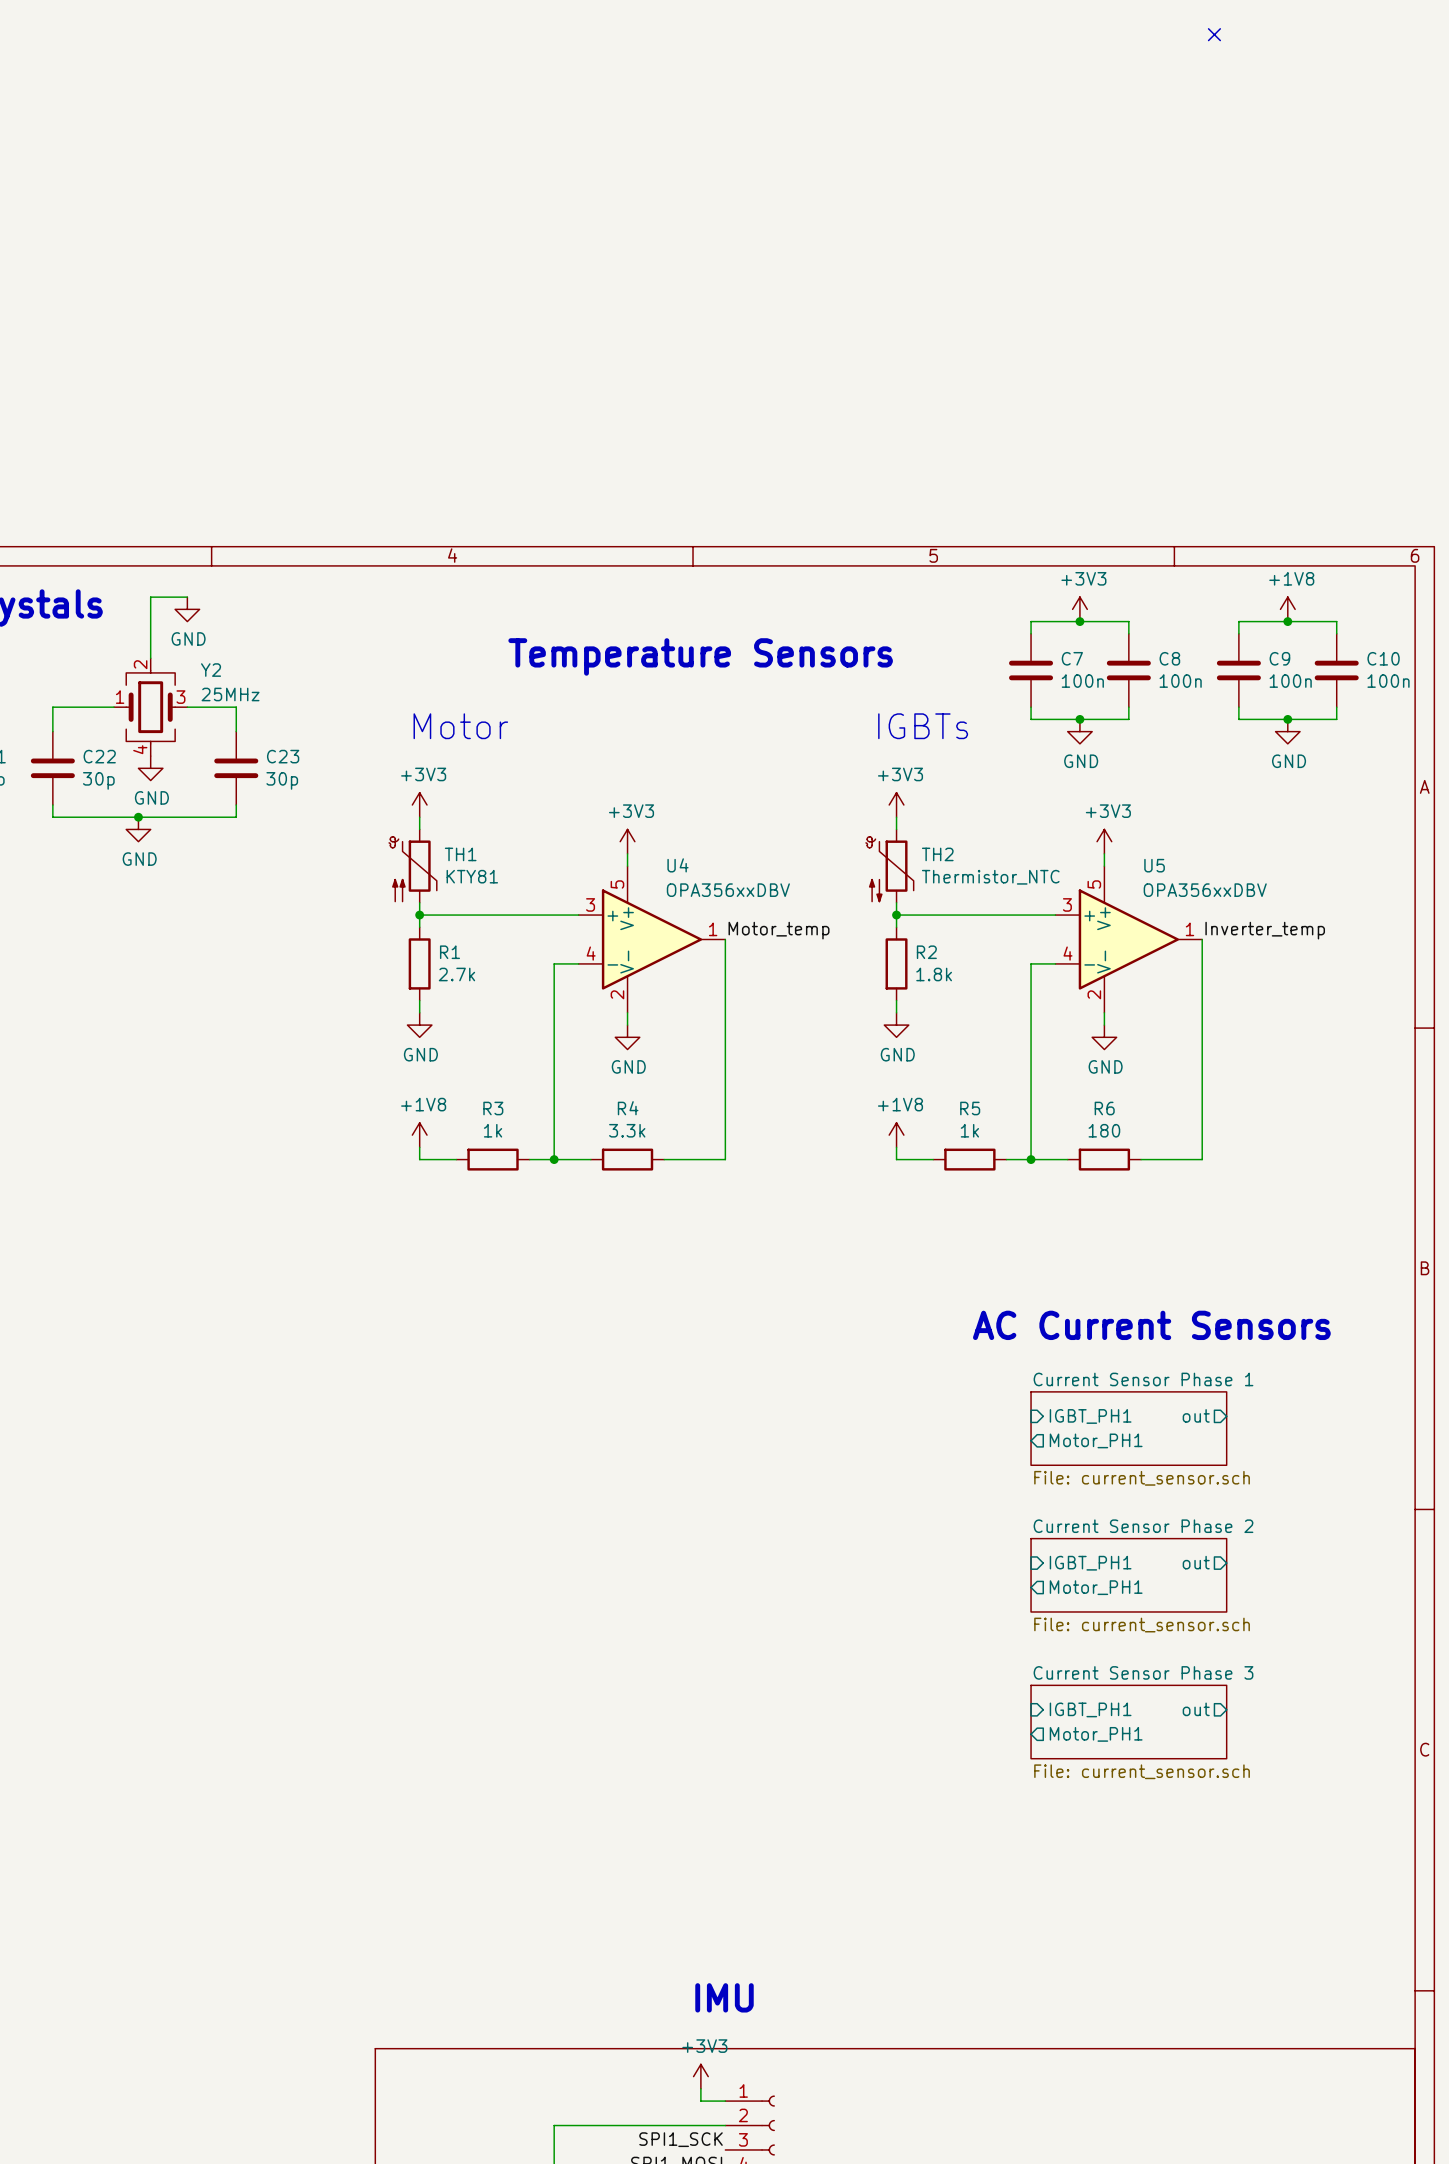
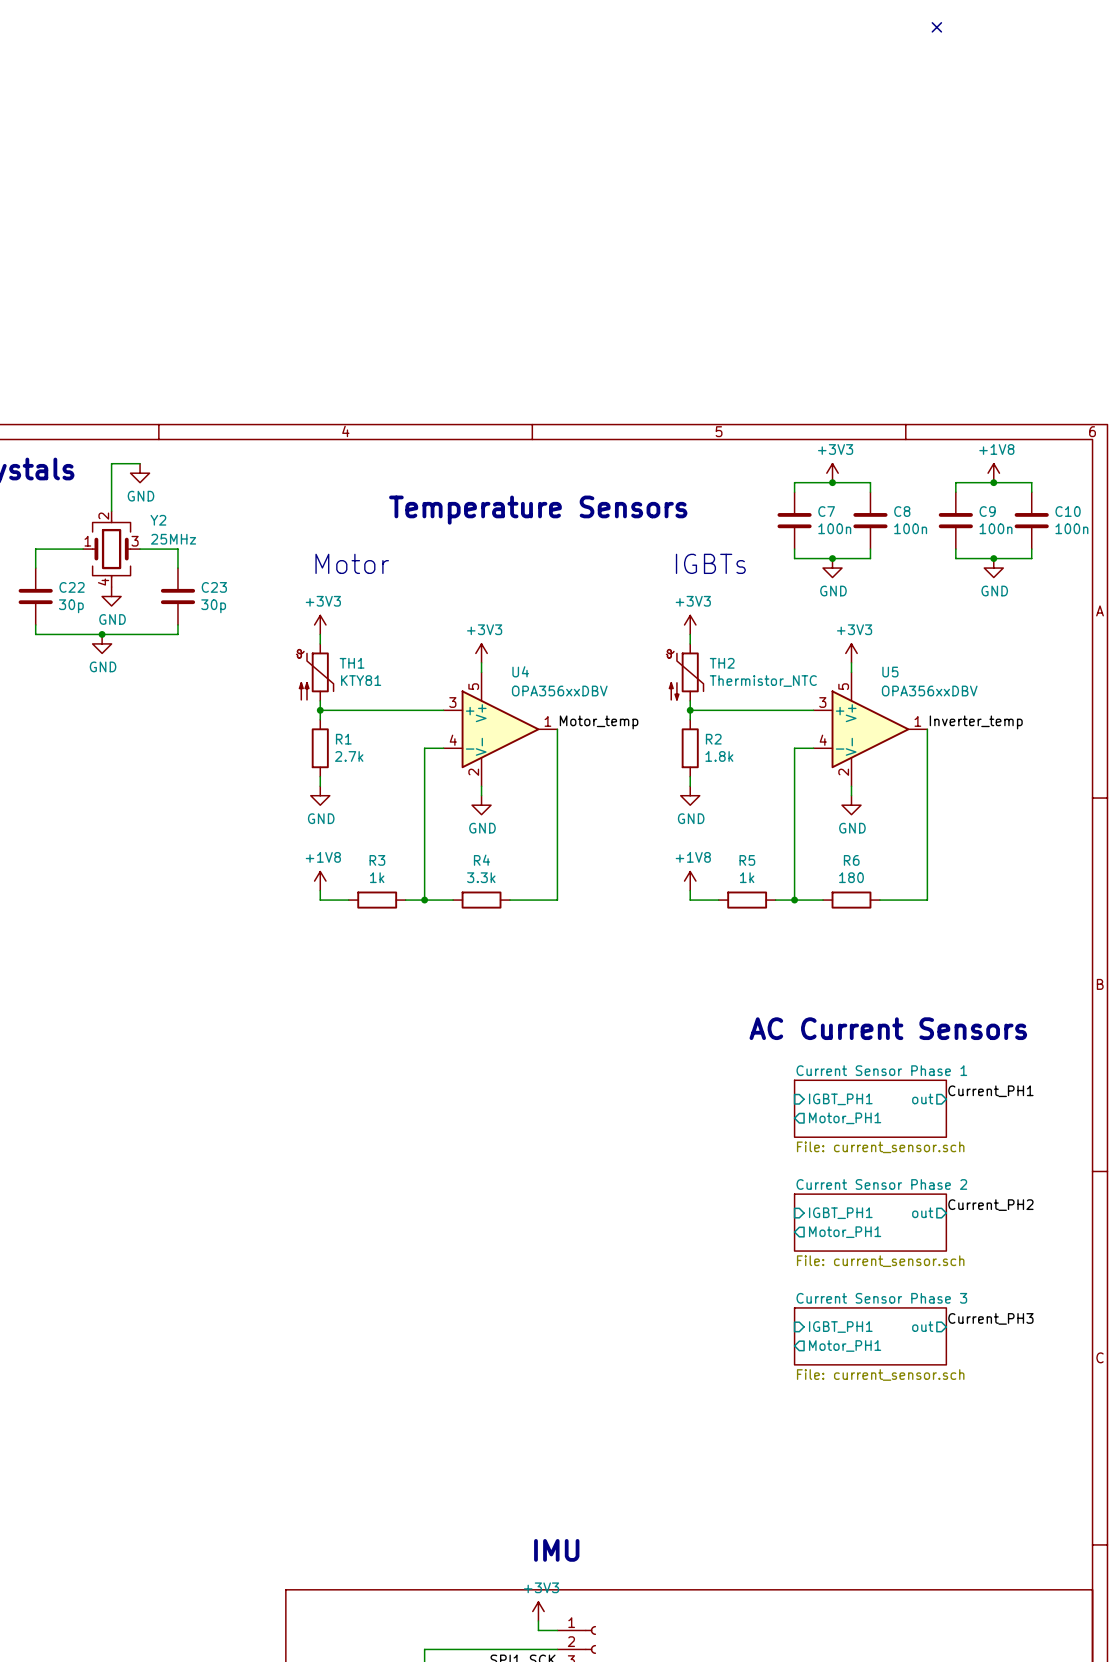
label: none -> Current_PH1 (990, 1091)
label: none -> Current_PH2 (990, 1205)
label: none -> Current_PH3 (990, 1318)

